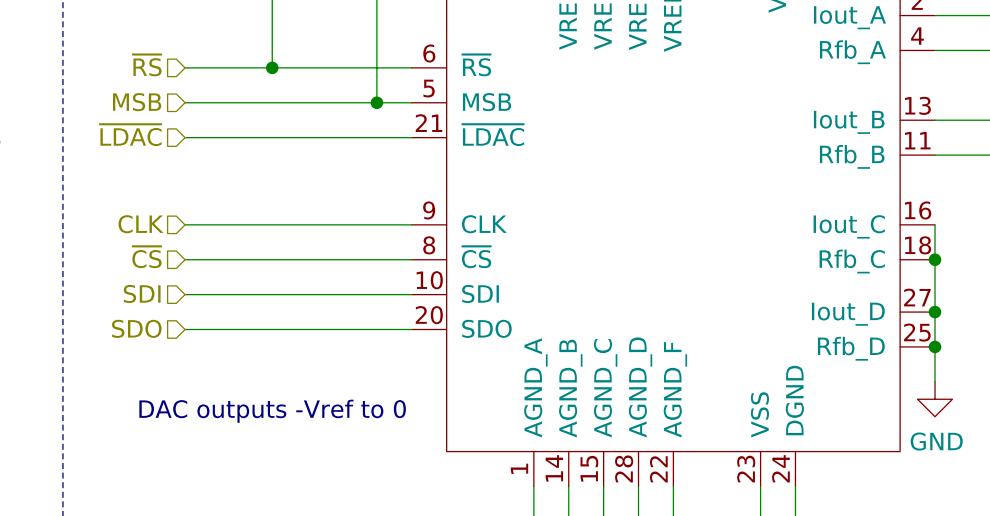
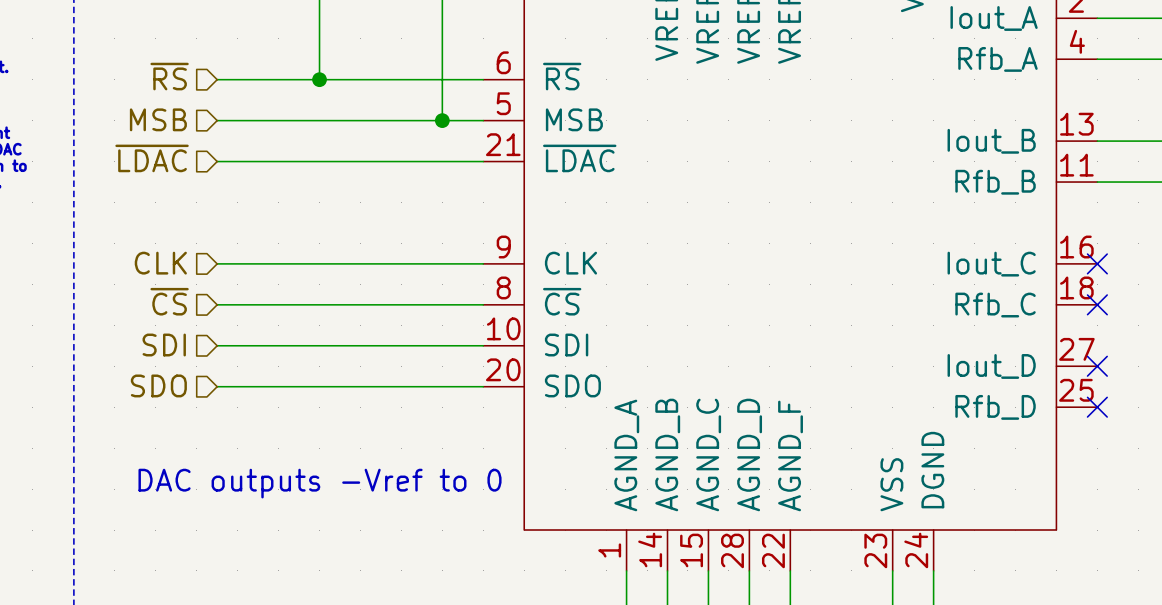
wire: (935, 224) (935, 381) -> none
no-connect mark: none -> (1097, 263)
junction: (935, 259) -> none
no-connect mark: none -> (1097, 304)
junction: (935, 312) -> none
no-connect mark: none -> (1097, 366)
junction: (935, 346) -> none
no-connect mark: none -> (1097, 407)
power symbol: GND (935, 399) -> none

